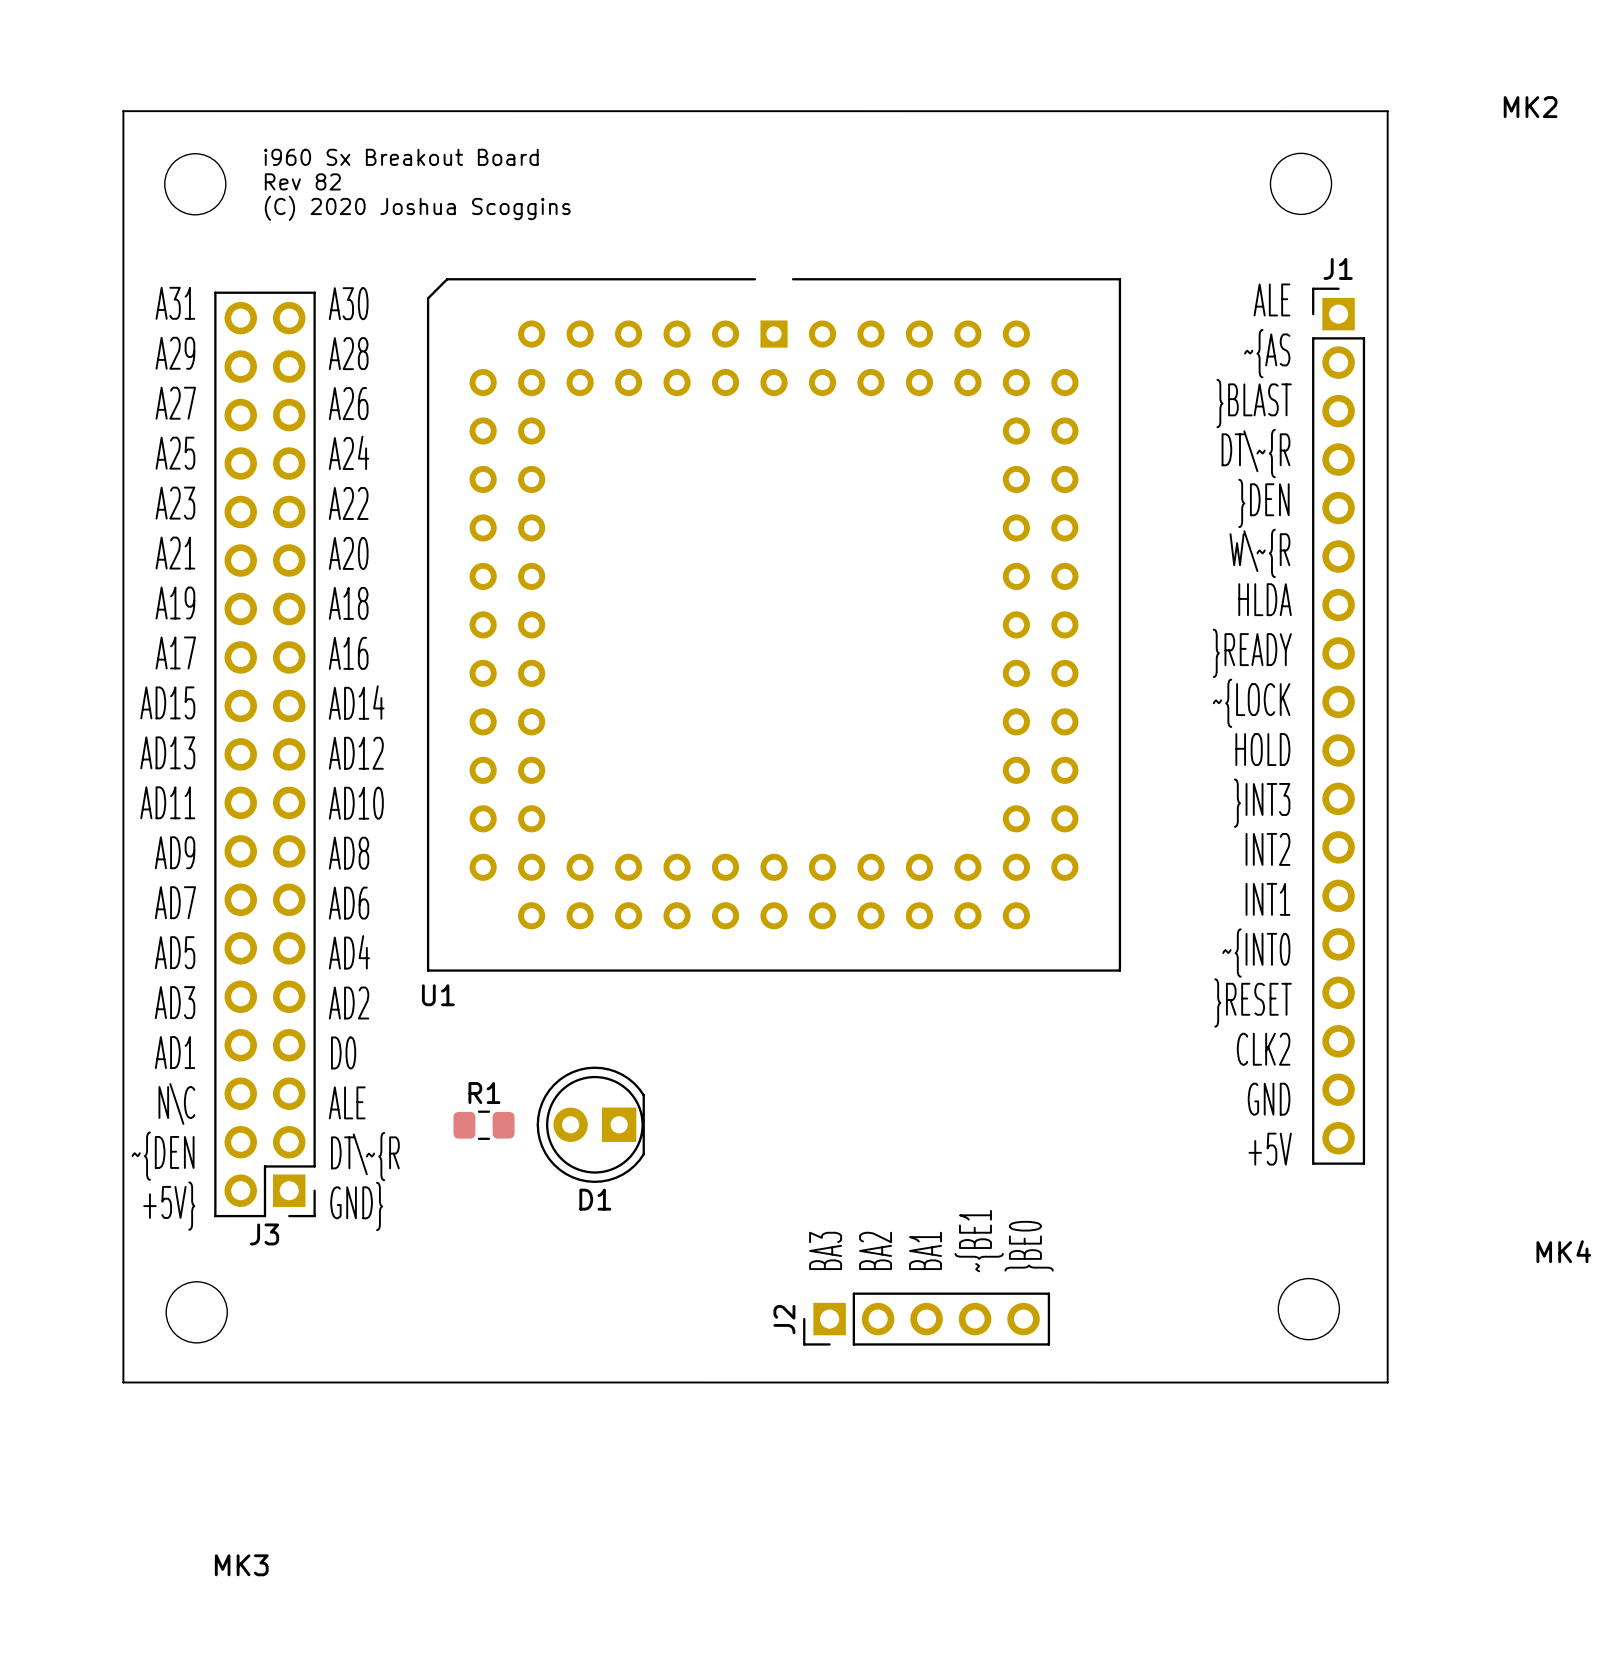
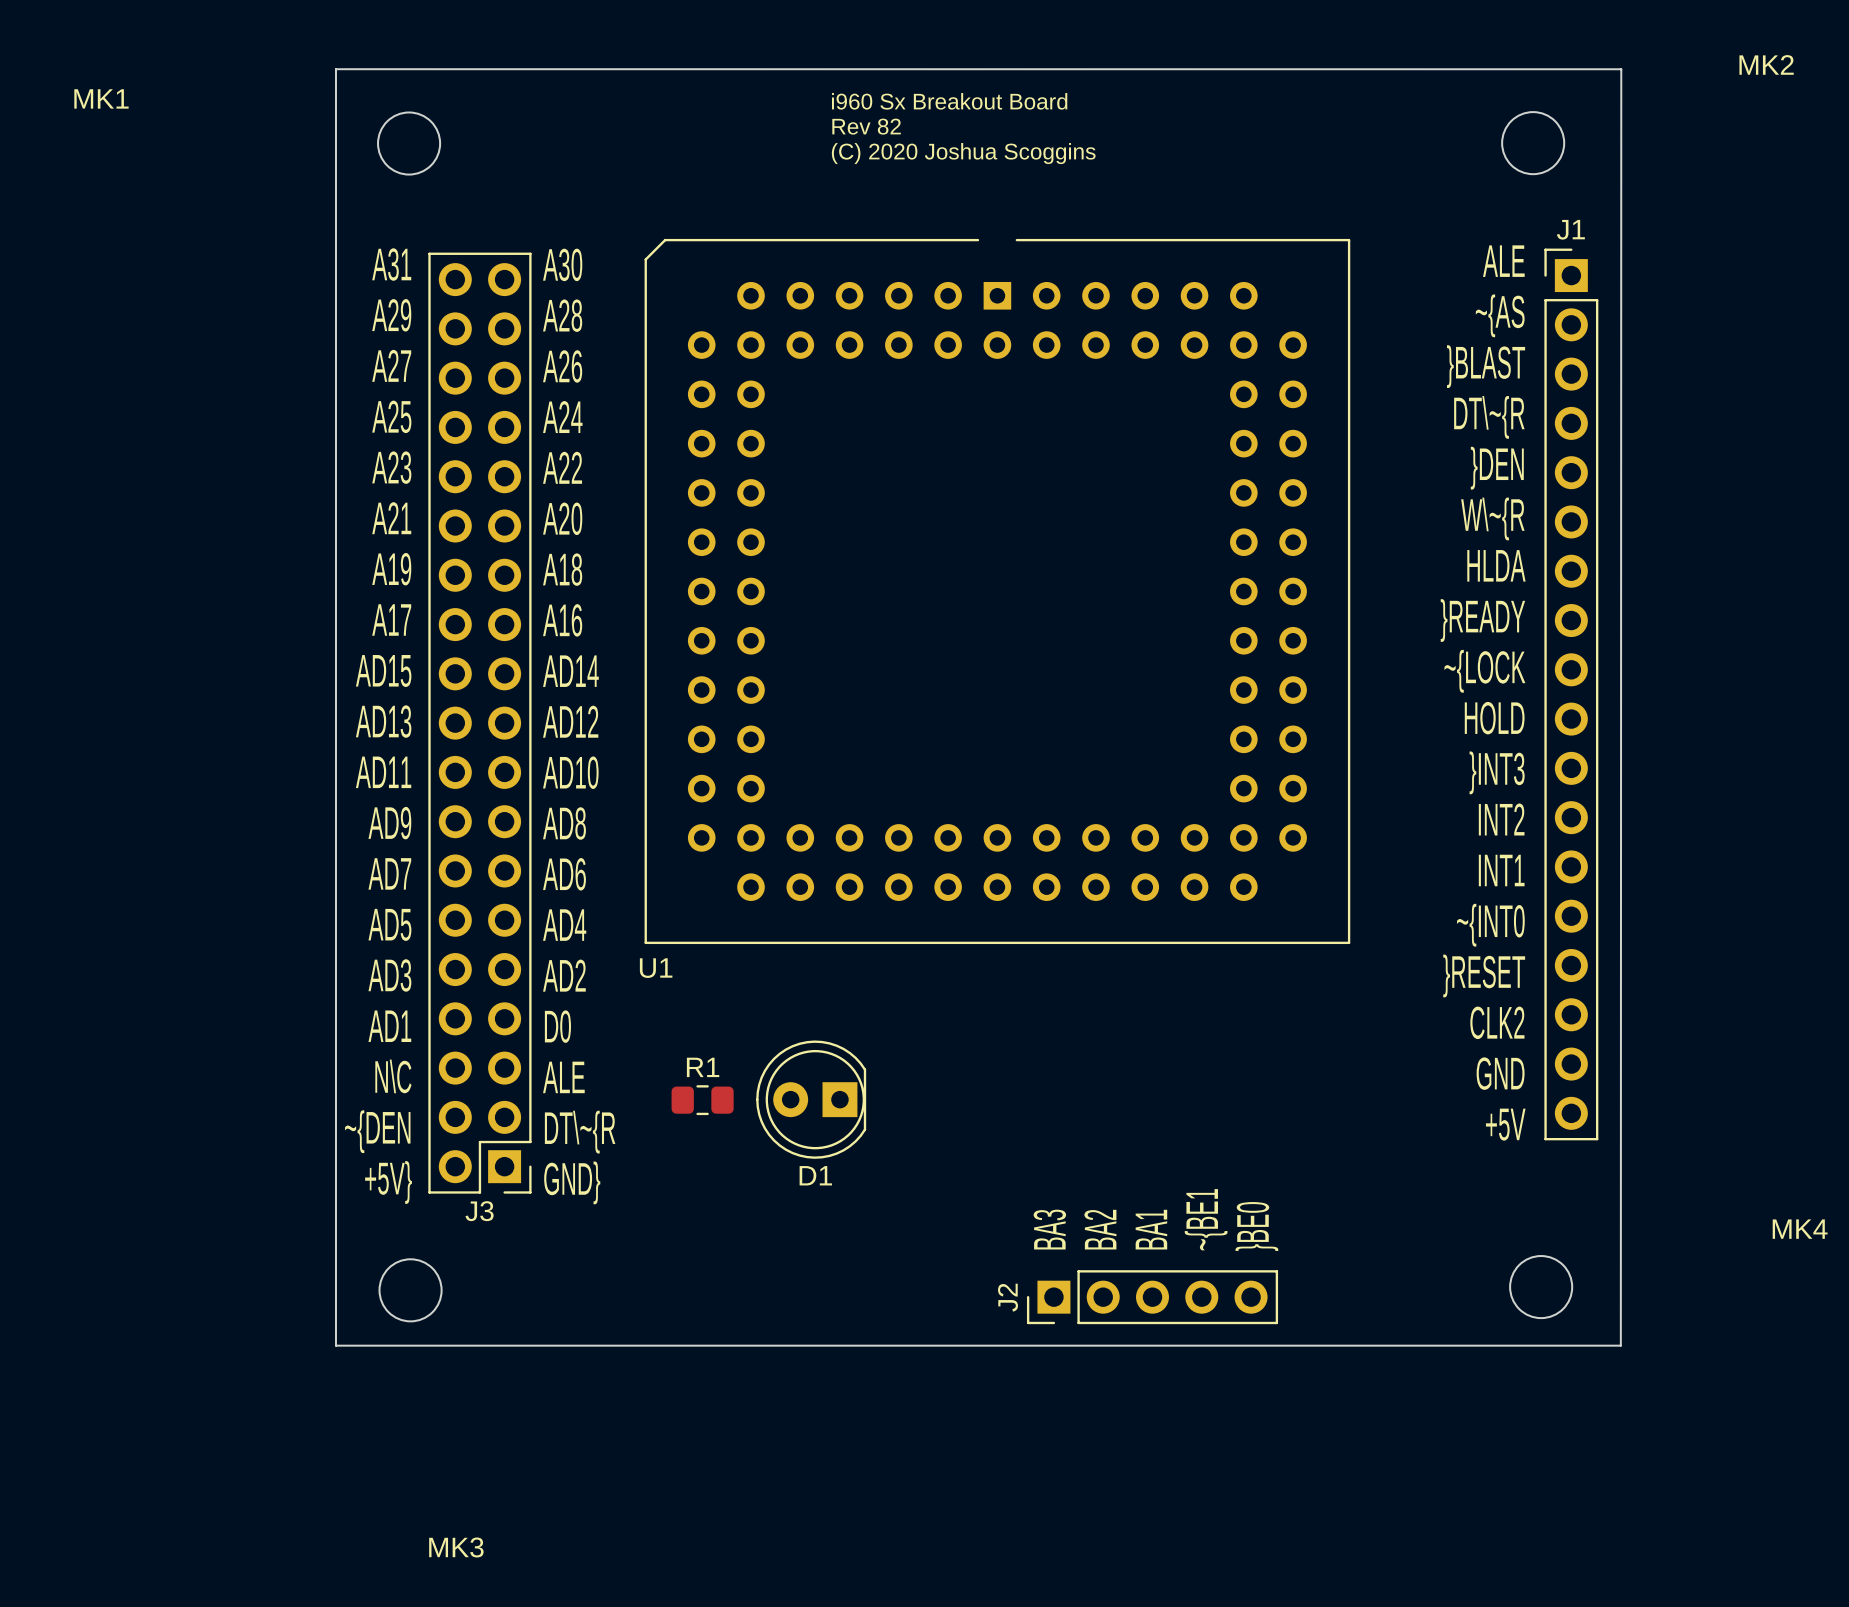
board edge: (1387, 111) (1387, 1382) (123, 1382) (123, 1366) -> (1621, 69) (1620, 1345) (335, 1345)
text position: i960 Sx Breakout Board (401, 157) -> i960 Sx Breakout Board (949, 101)
text position: Rev 82 (302, 181) -> Rev 82 (866, 126)
text position: (C) 2020 Joshua Scoggins (417, 208) -> (C) 2020 Joshua Scoggins (963, 153)

